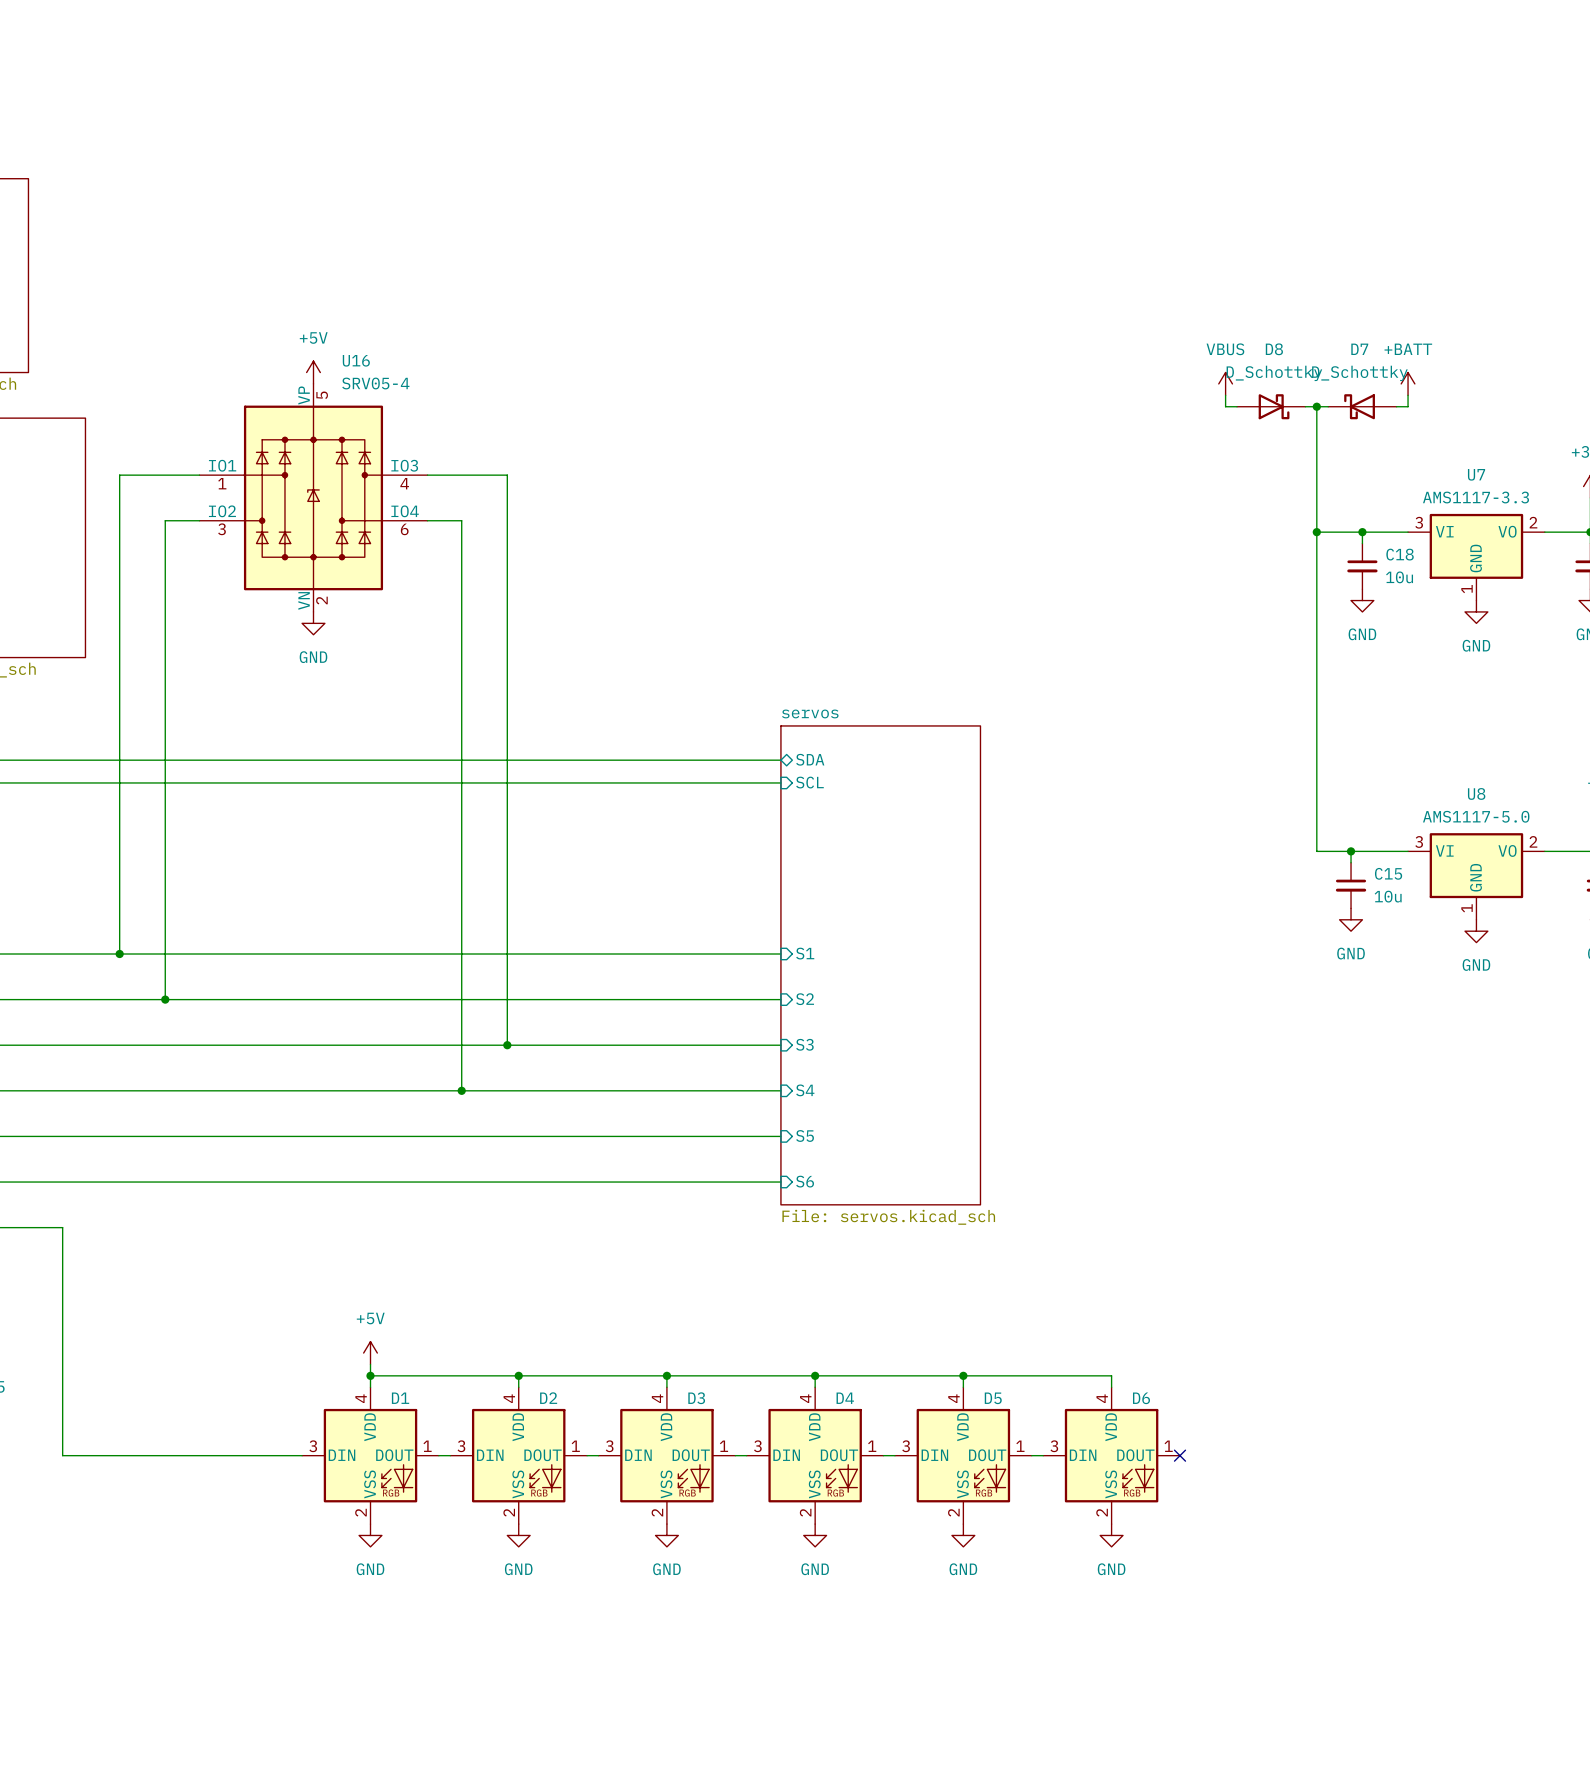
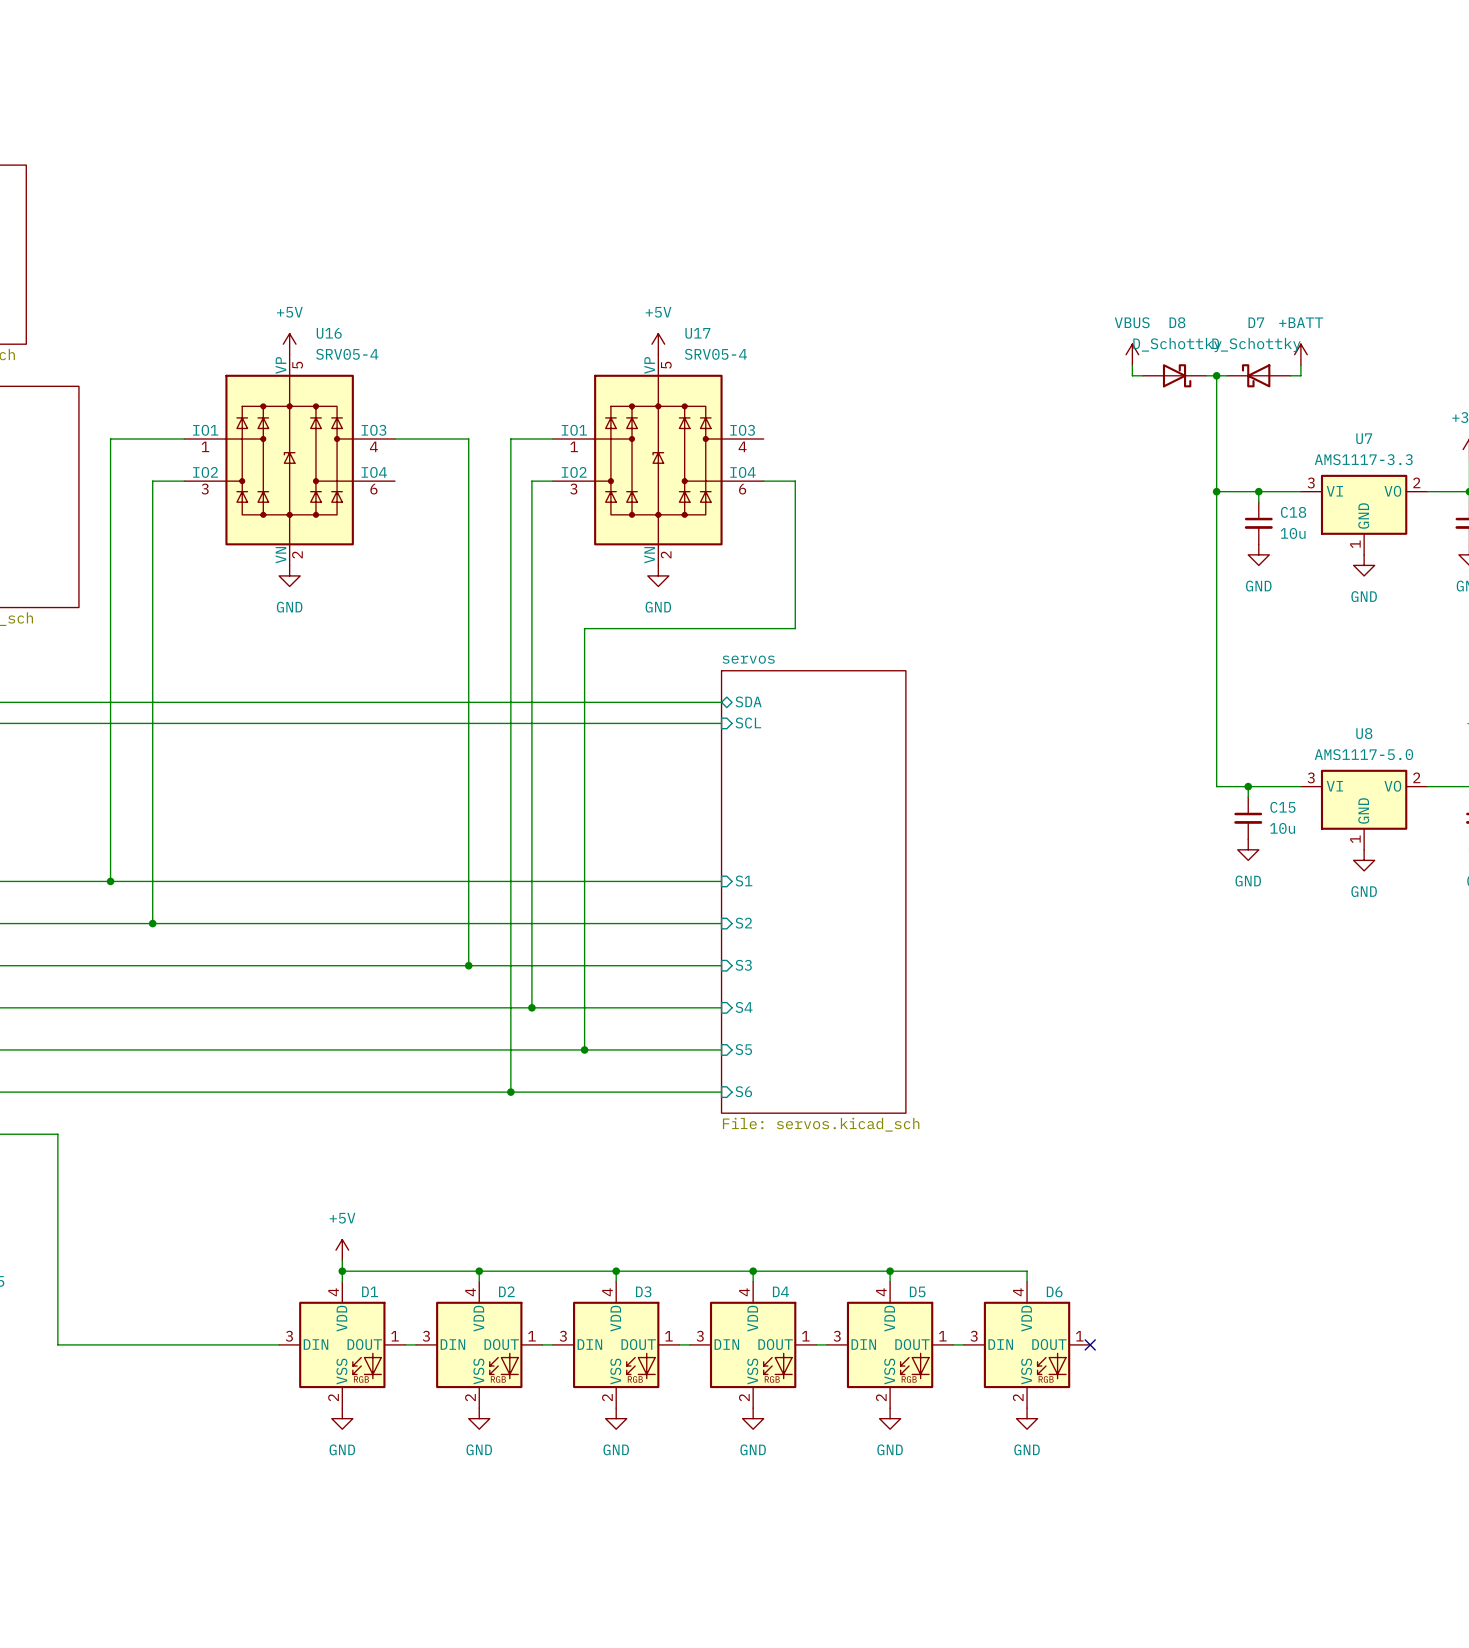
power symbol: none -> +5V (658, 344)
wire: none -> (553, 438) (510, 438) (510, 1092)
U17: none -> SRV05-4 (658, 460)
wire: (427, 520) (461, 520) (461, 1090) -> none
wire: none -> (553, 481) (531, 481) (531, 1007)
wire: none -> (763, 481) (795, 481) (795, 628) (584, 628) (584, 1049)
power symbol: none -> GND (658, 575)
junction: (461, 1090) -> none
junction: none -> (531, 1007)
junction: none -> (584, 1049)
junction: none -> (510, 1092)

